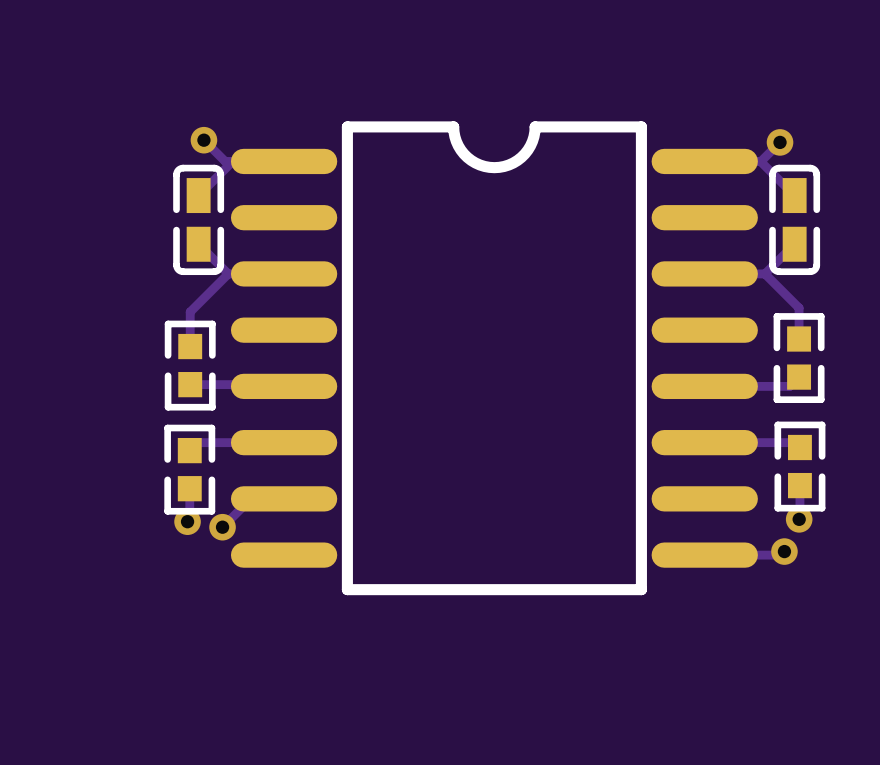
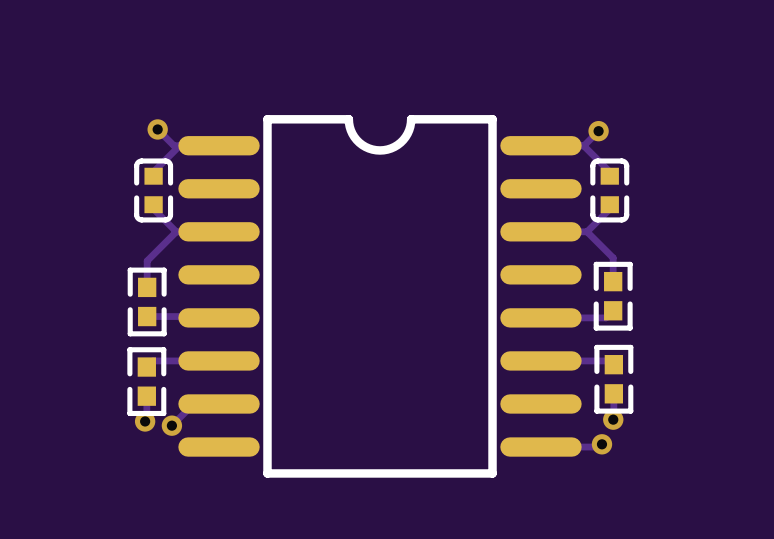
part footprint: [173, 164, 225, 276] -> [134, 158, 174, 223]
part footprint: [769, 164, 821, 276] -> [590, 158, 630, 223]

